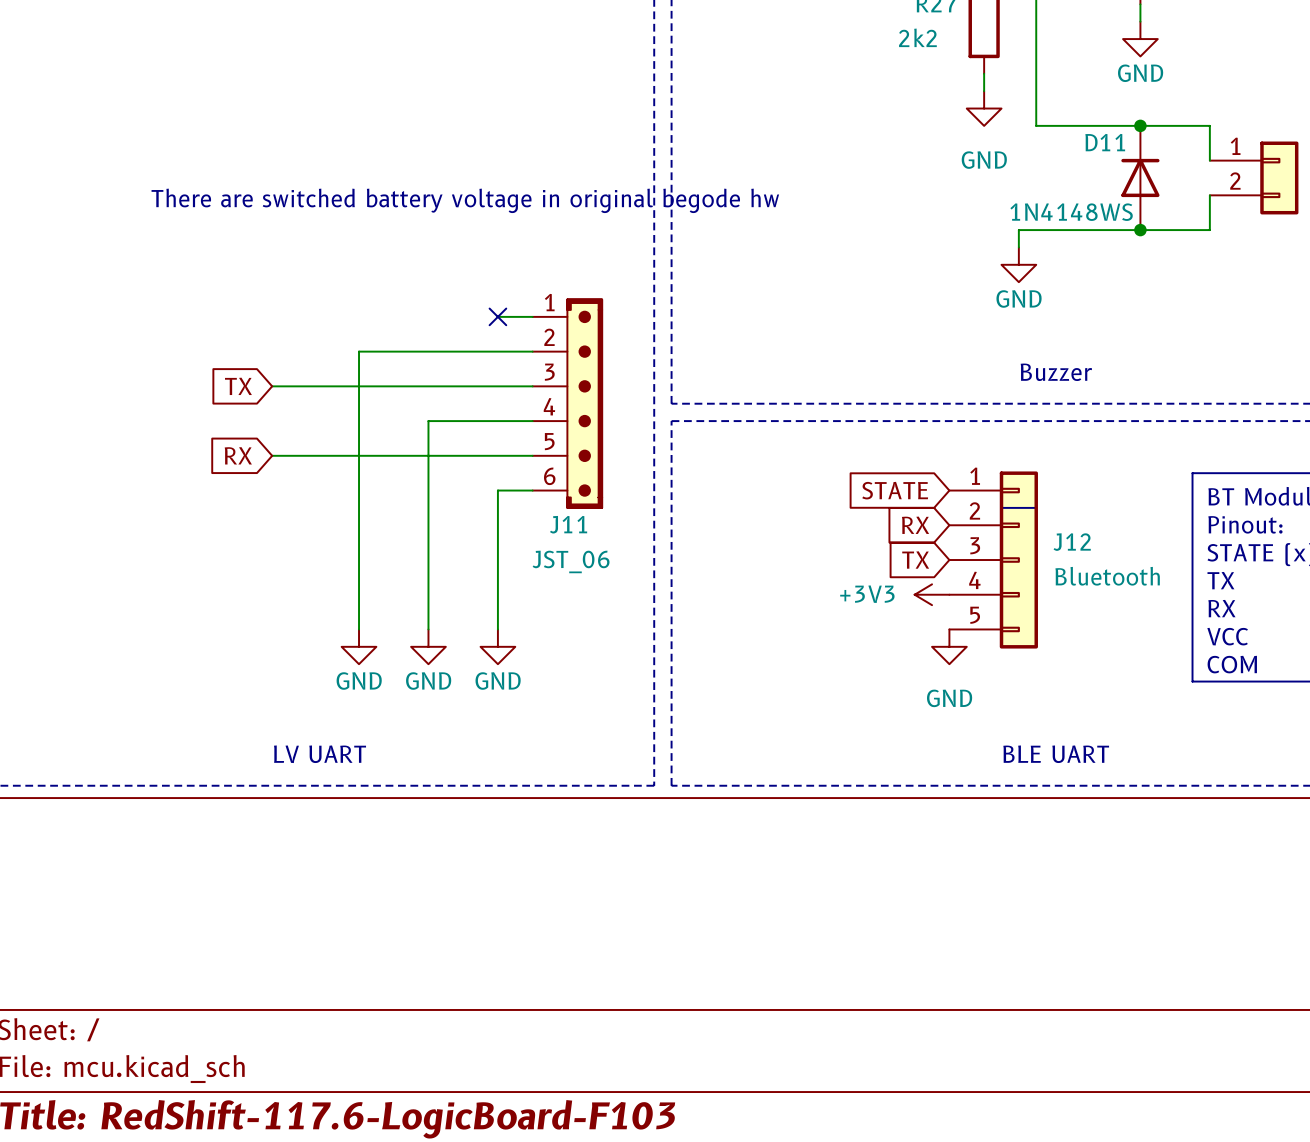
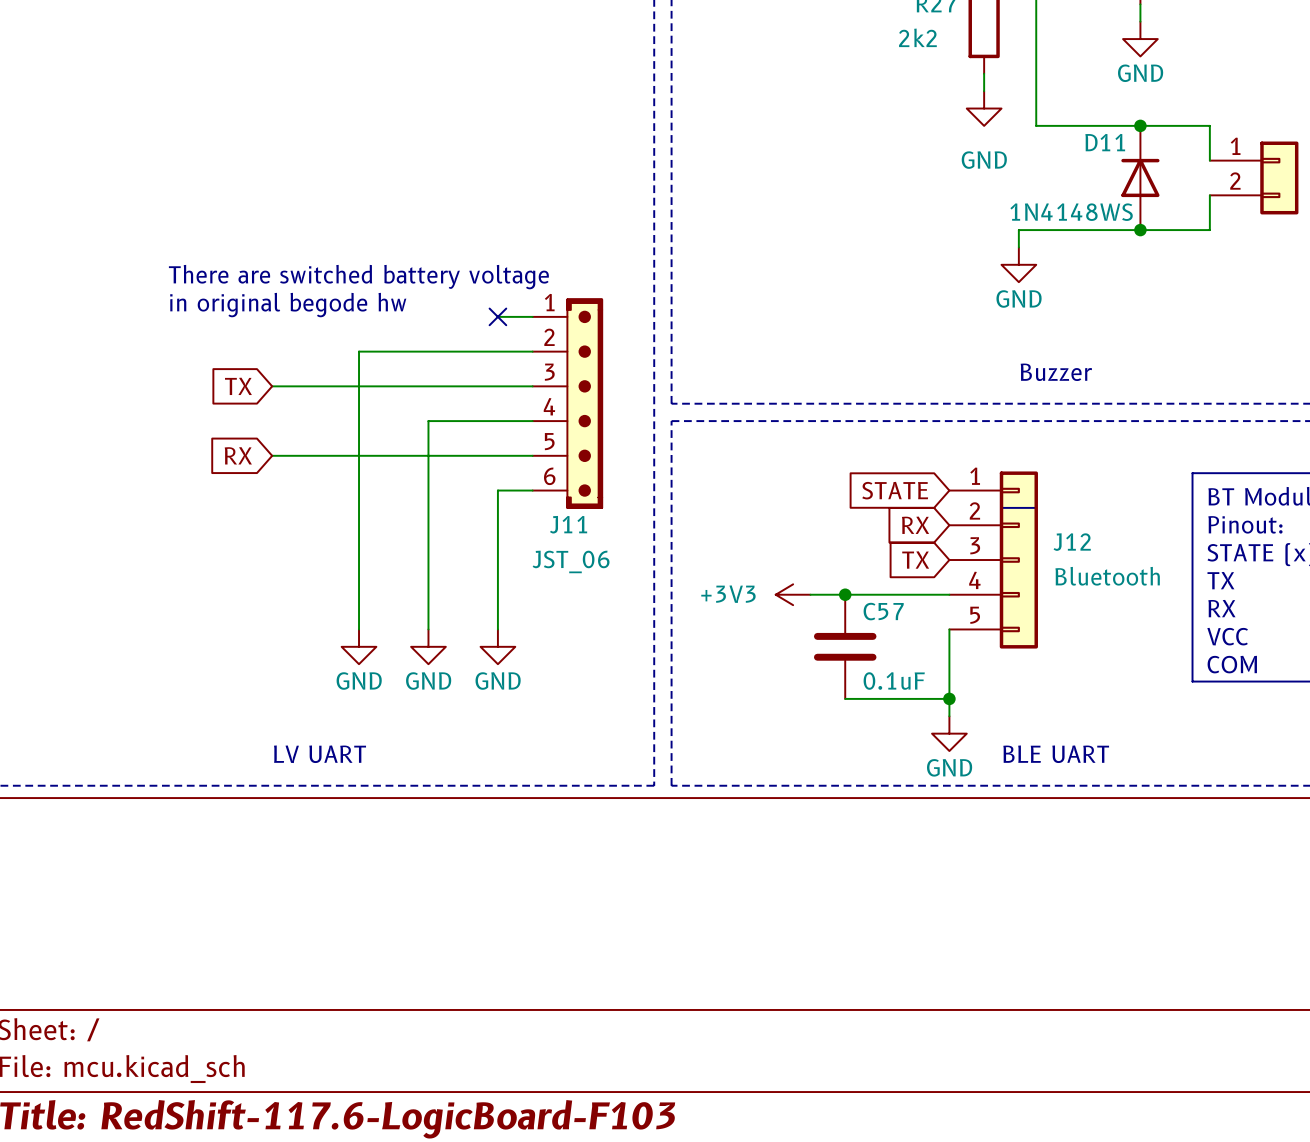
text: There are switched battery voltage in original begode hw (465, 200) -> none
text: none -> There are switched battery voltage (358, 277)
text: none -> in original begode hw (288, 305)
wire: none -> (810, 594) (949, 594)
junction: none -> (845, 594)
power symbol position: +3V3 (932, 594) -> +3V3 (793, 594)
wire: none -> (949, 629) (949, 716)
C57: none -> 0.1uF (845, 646)
power symbol position: GND (949, 646) -> GND (949, 733)
wire: none -> (845, 698) (949, 698)
power symbol text position: GND (949, 698) -> GND (949, 767)
junction: none -> (949, 698)

